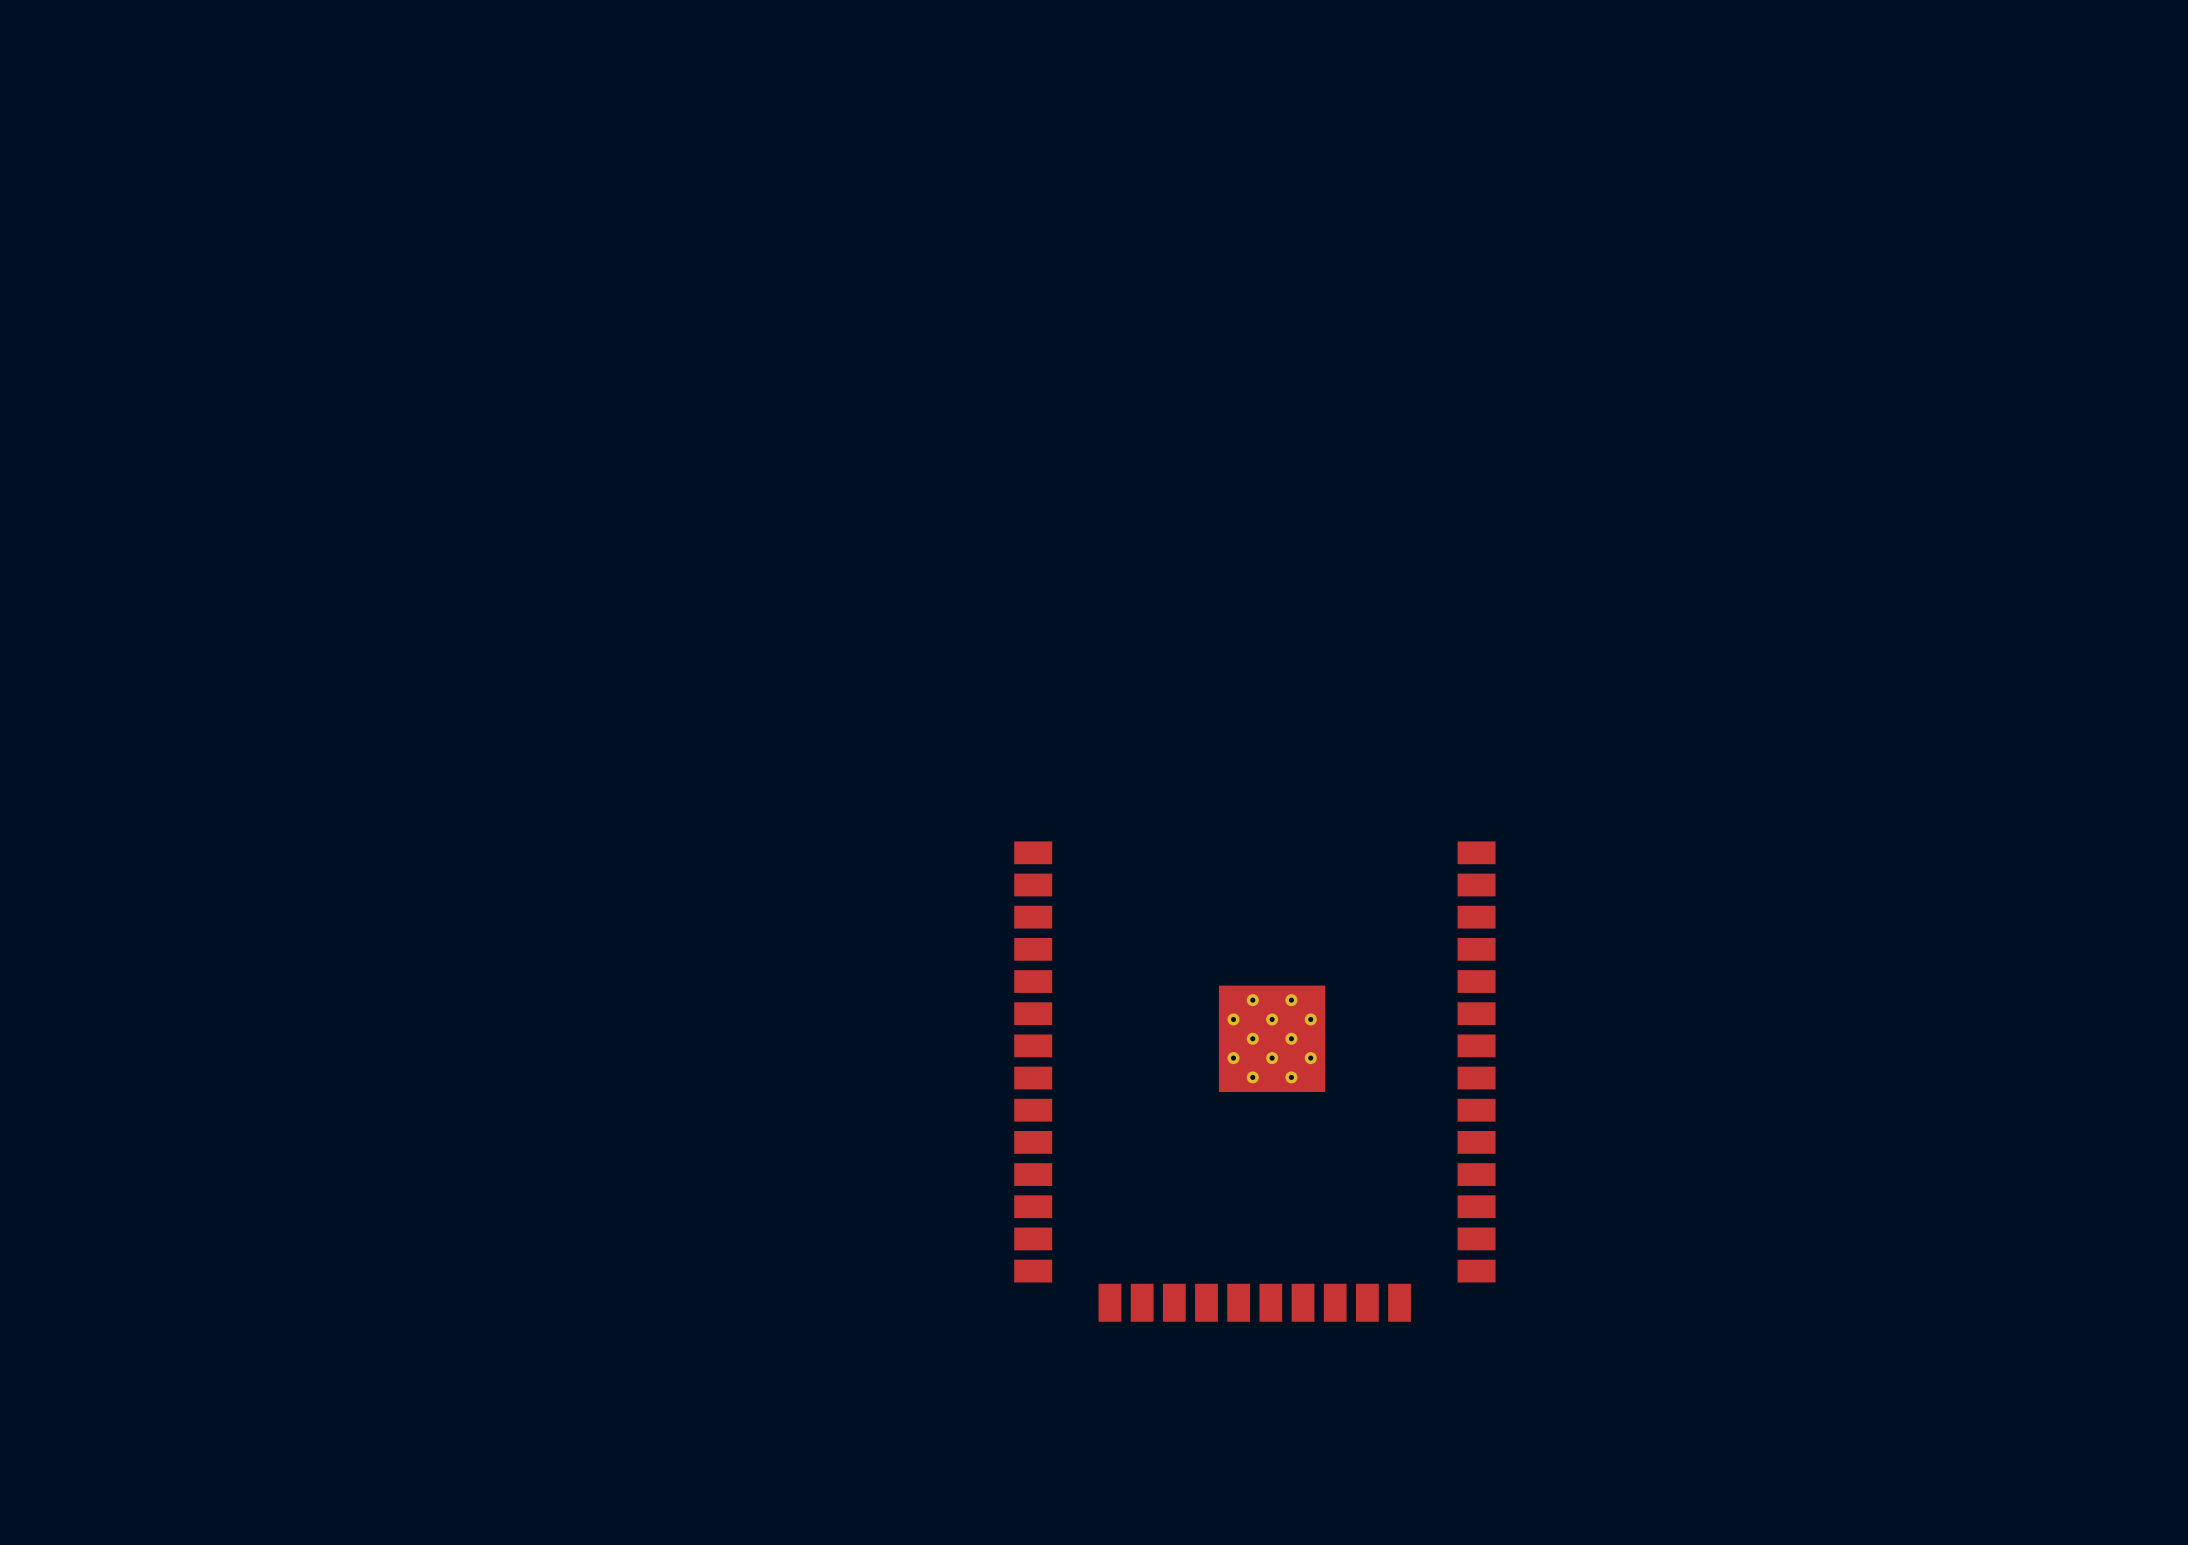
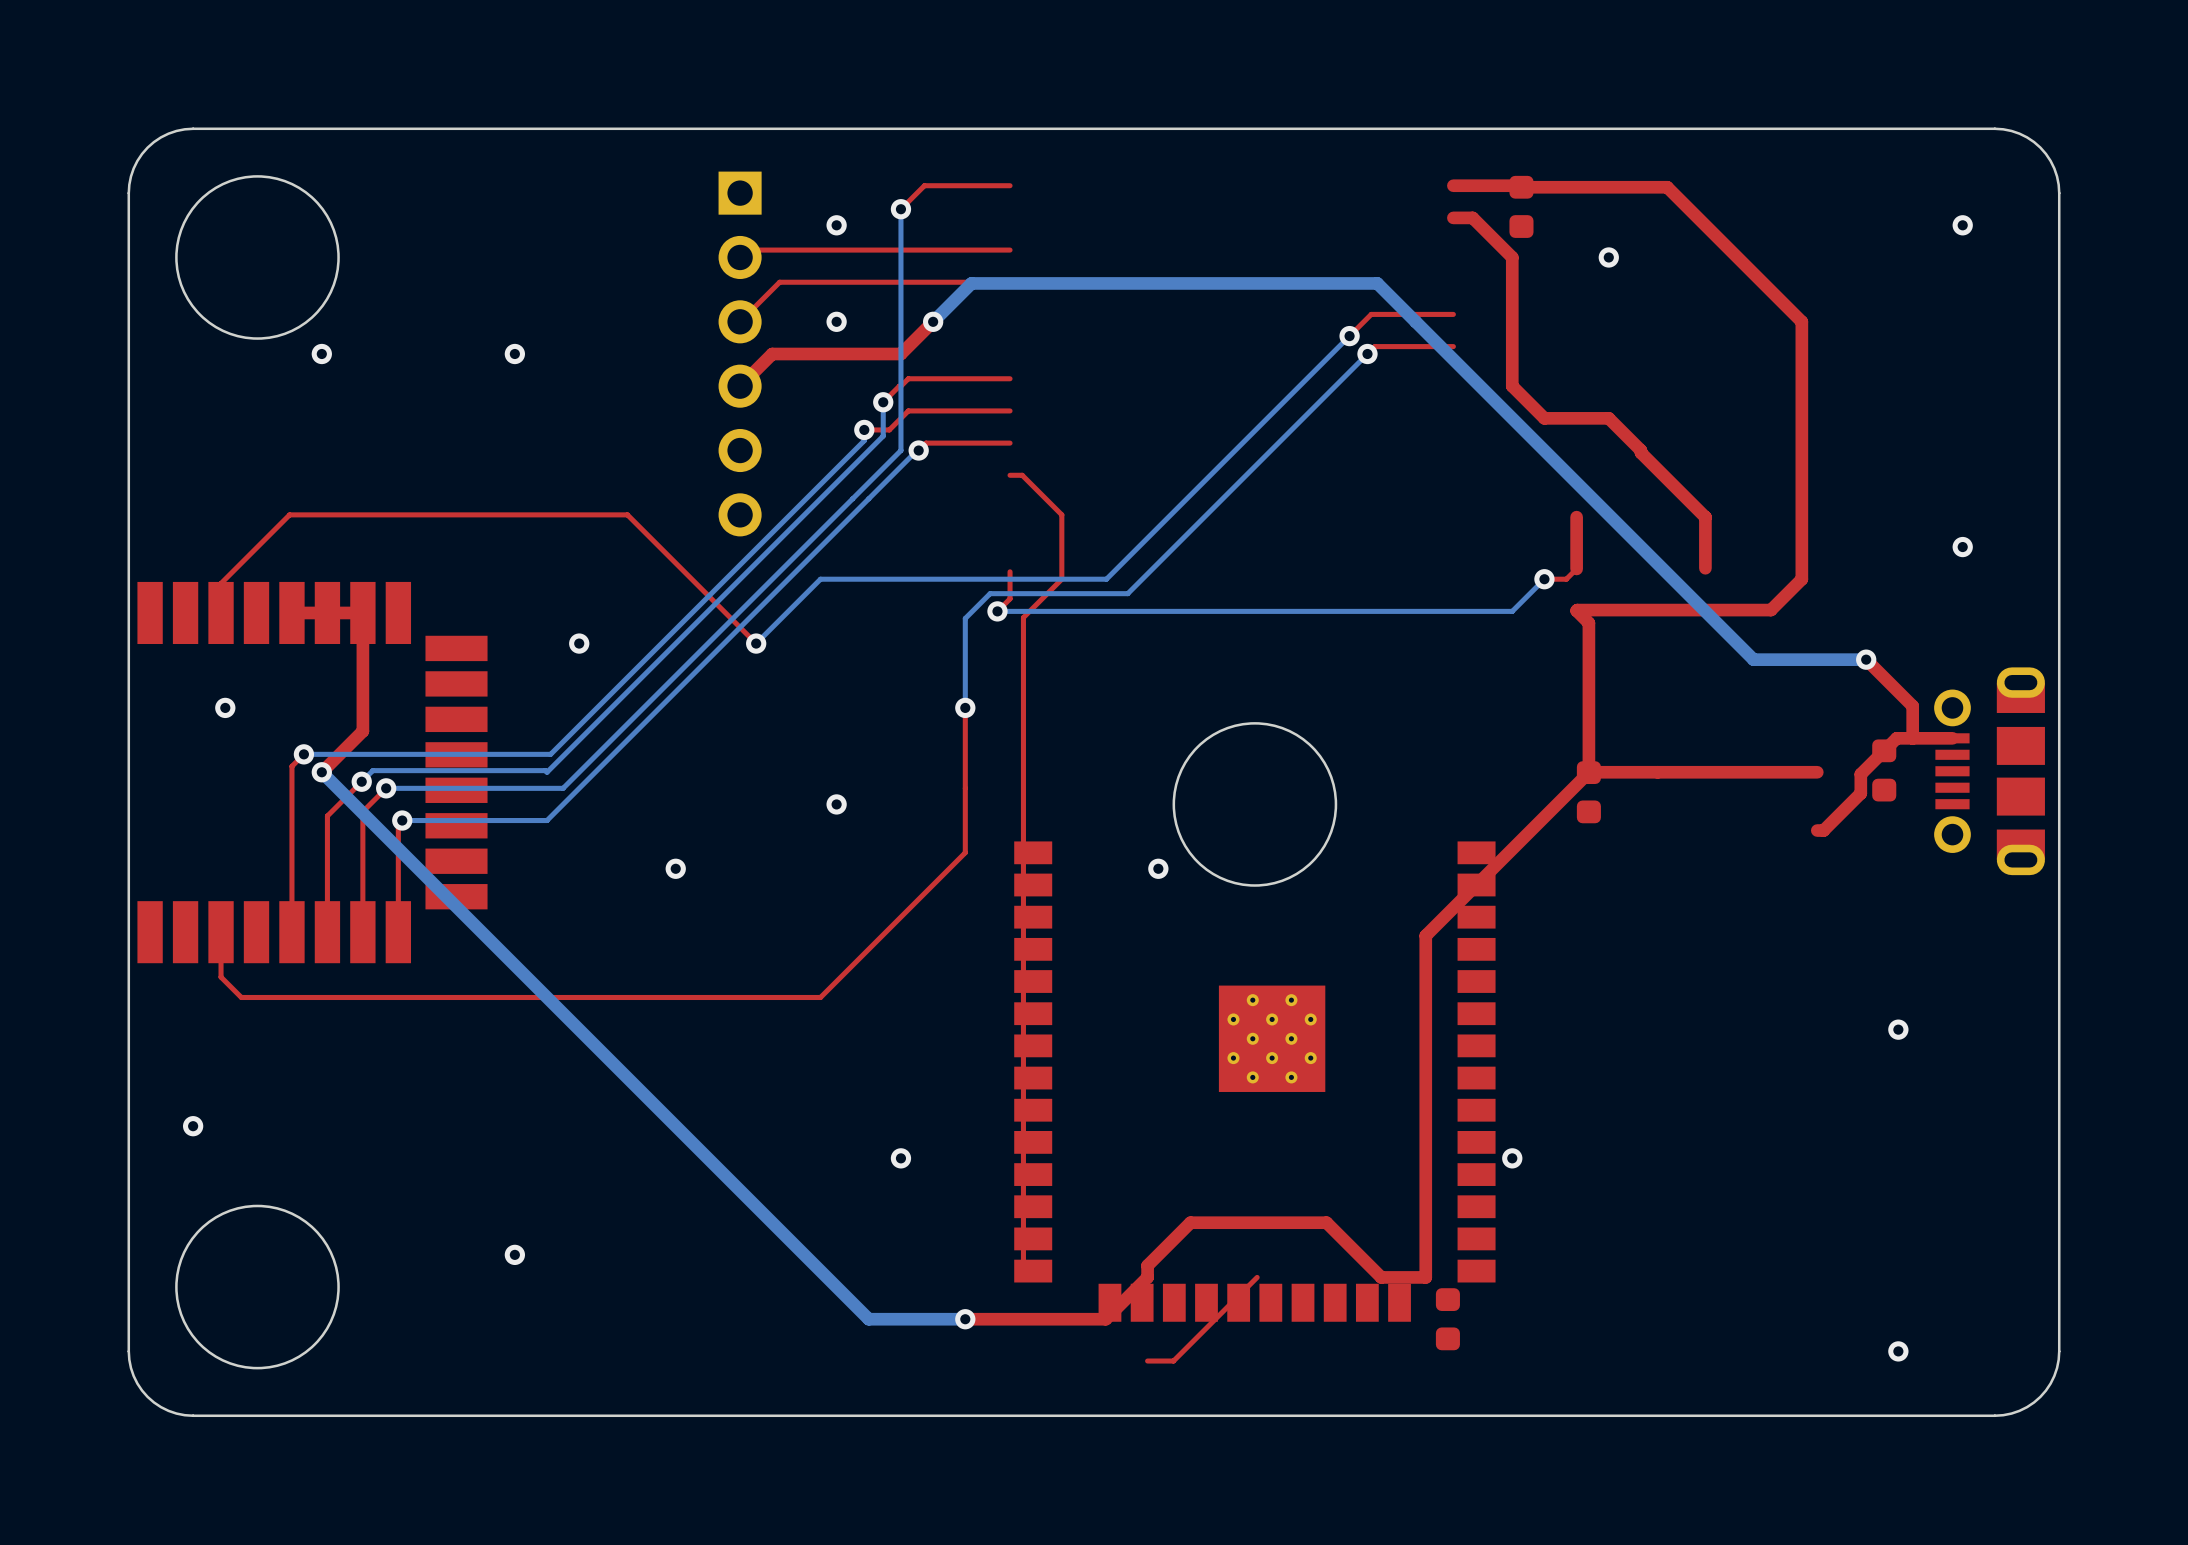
board edge: none -> (1994, 128) (193, 128) (176, 130) (153, 142) (142, 153) (133, 168) (128, 193) (128, 1351) (133, 1376) (142, 1390) (160, 1407) (176, 1413) (193, 1415) (1994, 1415) (2011, 1413) (2034, 1402) (2045, 1390) (2054, 1376) (2059, 1351) (2059, 193) (2054, 168) (2040, 147) (2019, 133) (1994, 128)
round board edge: none -> [175, 175, 340, 340]
top track: none -> (1010, 185) (924, 185) (900, 209)
top track: none -> (1453, 185) (1667, 187) (1801, 321) (1801, 579) (1770, 610) (1577, 610) (1588, 623) (1588, 772)
part: none -> (1521, 206)
bottom track: none -> (900, 209) (900, 450) (563, 788) (386, 788)
via: none -> (900, 209)
top track: none -> (1453, 217) (1472, 217) (1512, 257) (1512, 386) (1544, 418) (1608, 418) (1705, 517) (1705, 568)
via: none -> (836, 225)
via: none -> (1962, 225)
top track: none -> (1010, 250) (747, 250) (740, 257)
via: none -> (1608, 257)
top track: none -> (1010, 282) (779, 282) (740, 321)
top track: none -> (1453, 314) (1371, 314) (1349, 336)
via: none -> (836, 321)
top track: none -> (933, 321) (900, 354) (772, 354) (740, 386)
bottom track: none -> (933, 321) (971, 283) (1377, 283) (1753, 659) (1866, 659)
via: none -> (933, 321)
bottom track: none -> (1349, 336) (1106, 579) (820, 579) (756, 643)
via: none -> (1349, 336)
top track: none -> (1453, 346) (1374, 346) (1367, 354)
via: none -> (321, 354)
via: none -> (514, 354)
part: none -> (740, 354)
bottom track: none -> (1367, 354) (1127, 593) (990, 593) (965, 618) (965, 707)
via: none -> (1367, 354)
top track: none -> (1010, 378) (908, 378) (883, 402)
bottom track: none -> (883, 402) (883, 436) (547, 772) (545, 770) (372, 770) (361, 781)
via: none -> (883, 402)
top track: none -> (1010, 410) (908, 410) (889, 429) (864, 429)
bottom track: none -> (864, 429) (864, 440) (550, 754) (303, 754)
via: none -> (864, 429)
top track: none -> (1010, 443) (926, 443) (918, 450)
bottom track: none -> (918, 450) (547, 820) (402, 820)
via: none -> (918, 450)
top track: none -> (1010, 475) (1022, 475) (1061, 514) (1061, 579) (1023, 617) (1023, 1277)
top track: none -> (1576, 517) (1576, 568) (1566, 579) (1544, 579)
via: none -> (1962, 547)
top track: none -> (1010, 571) (1010, 598) (997, 611)
bottom track: none -> (1544, 579) (1512, 611) (997, 611)
via: none -> (1544, 579)
via: none -> (997, 611)
top track: none -> (221, 612) (221, 583) (289, 514) (627, 514) (756, 643)
top track: none -> (291, 612) (362, 612) (362, 731) (321, 772)
via: none -> (579, 643)
via: none -> (756, 643)
top track: none -> (1866, 659) (1912, 706) (1912, 738)
via: none -> (1866, 659)
via: none -> (225, 707)
top track: none -> (965, 707) (965, 852) (820, 997) (241, 997) (221, 977) (221, 932)
via: none -> (965, 707)
round board edge: none -> [1172, 722, 1338, 887]
top track: none -> (1952, 738) (1896, 738) (1860, 774) (1860, 793) (1823, 830) (1817, 830)
top track: none -> (303, 754) (291, 766) (291, 932)
via: none -> (303, 754)
part: none -> (1884, 770)
part: none -> (1989, 771)
part: none -> (312, 772)
bottom track: none -> (321, 772) (868, 1319) (965, 1319)
via: none -> (321, 772)
top track: none -> (1817, 772) (1589, 772) (1425, 935) (1425, 1277) (1381, 1277) (1326, 1222) (1190, 1222) (1147, 1265) (1147, 1277) (1105, 1319) (965, 1319)
top track: none -> (361, 781) (327, 816) (327, 932)
via: none -> (361, 781)
top track: none -> (386, 788) (362, 811) (362, 932)
via: none -> (386, 788)
part: none -> (1588, 792)
via: none -> (836, 804)
top track: none -> (402, 820) (398, 824) (398, 932)
via: none -> (402, 820)
via: none -> (675, 868)
via: none -> (1158, 868)
via: none -> (1898, 1029)
via: none -> (193, 1126)
via: none -> (900, 1158)
via: none -> (1512, 1158)
round board edge: none -> [175, 1204, 340, 1370]
via: none -> (514, 1254)
top track: none -> (1257, 1277) (1173, 1361) (1147, 1361)
via: none -> (965, 1319)
part: none -> (1447, 1319)
via: none -> (1898, 1351)

